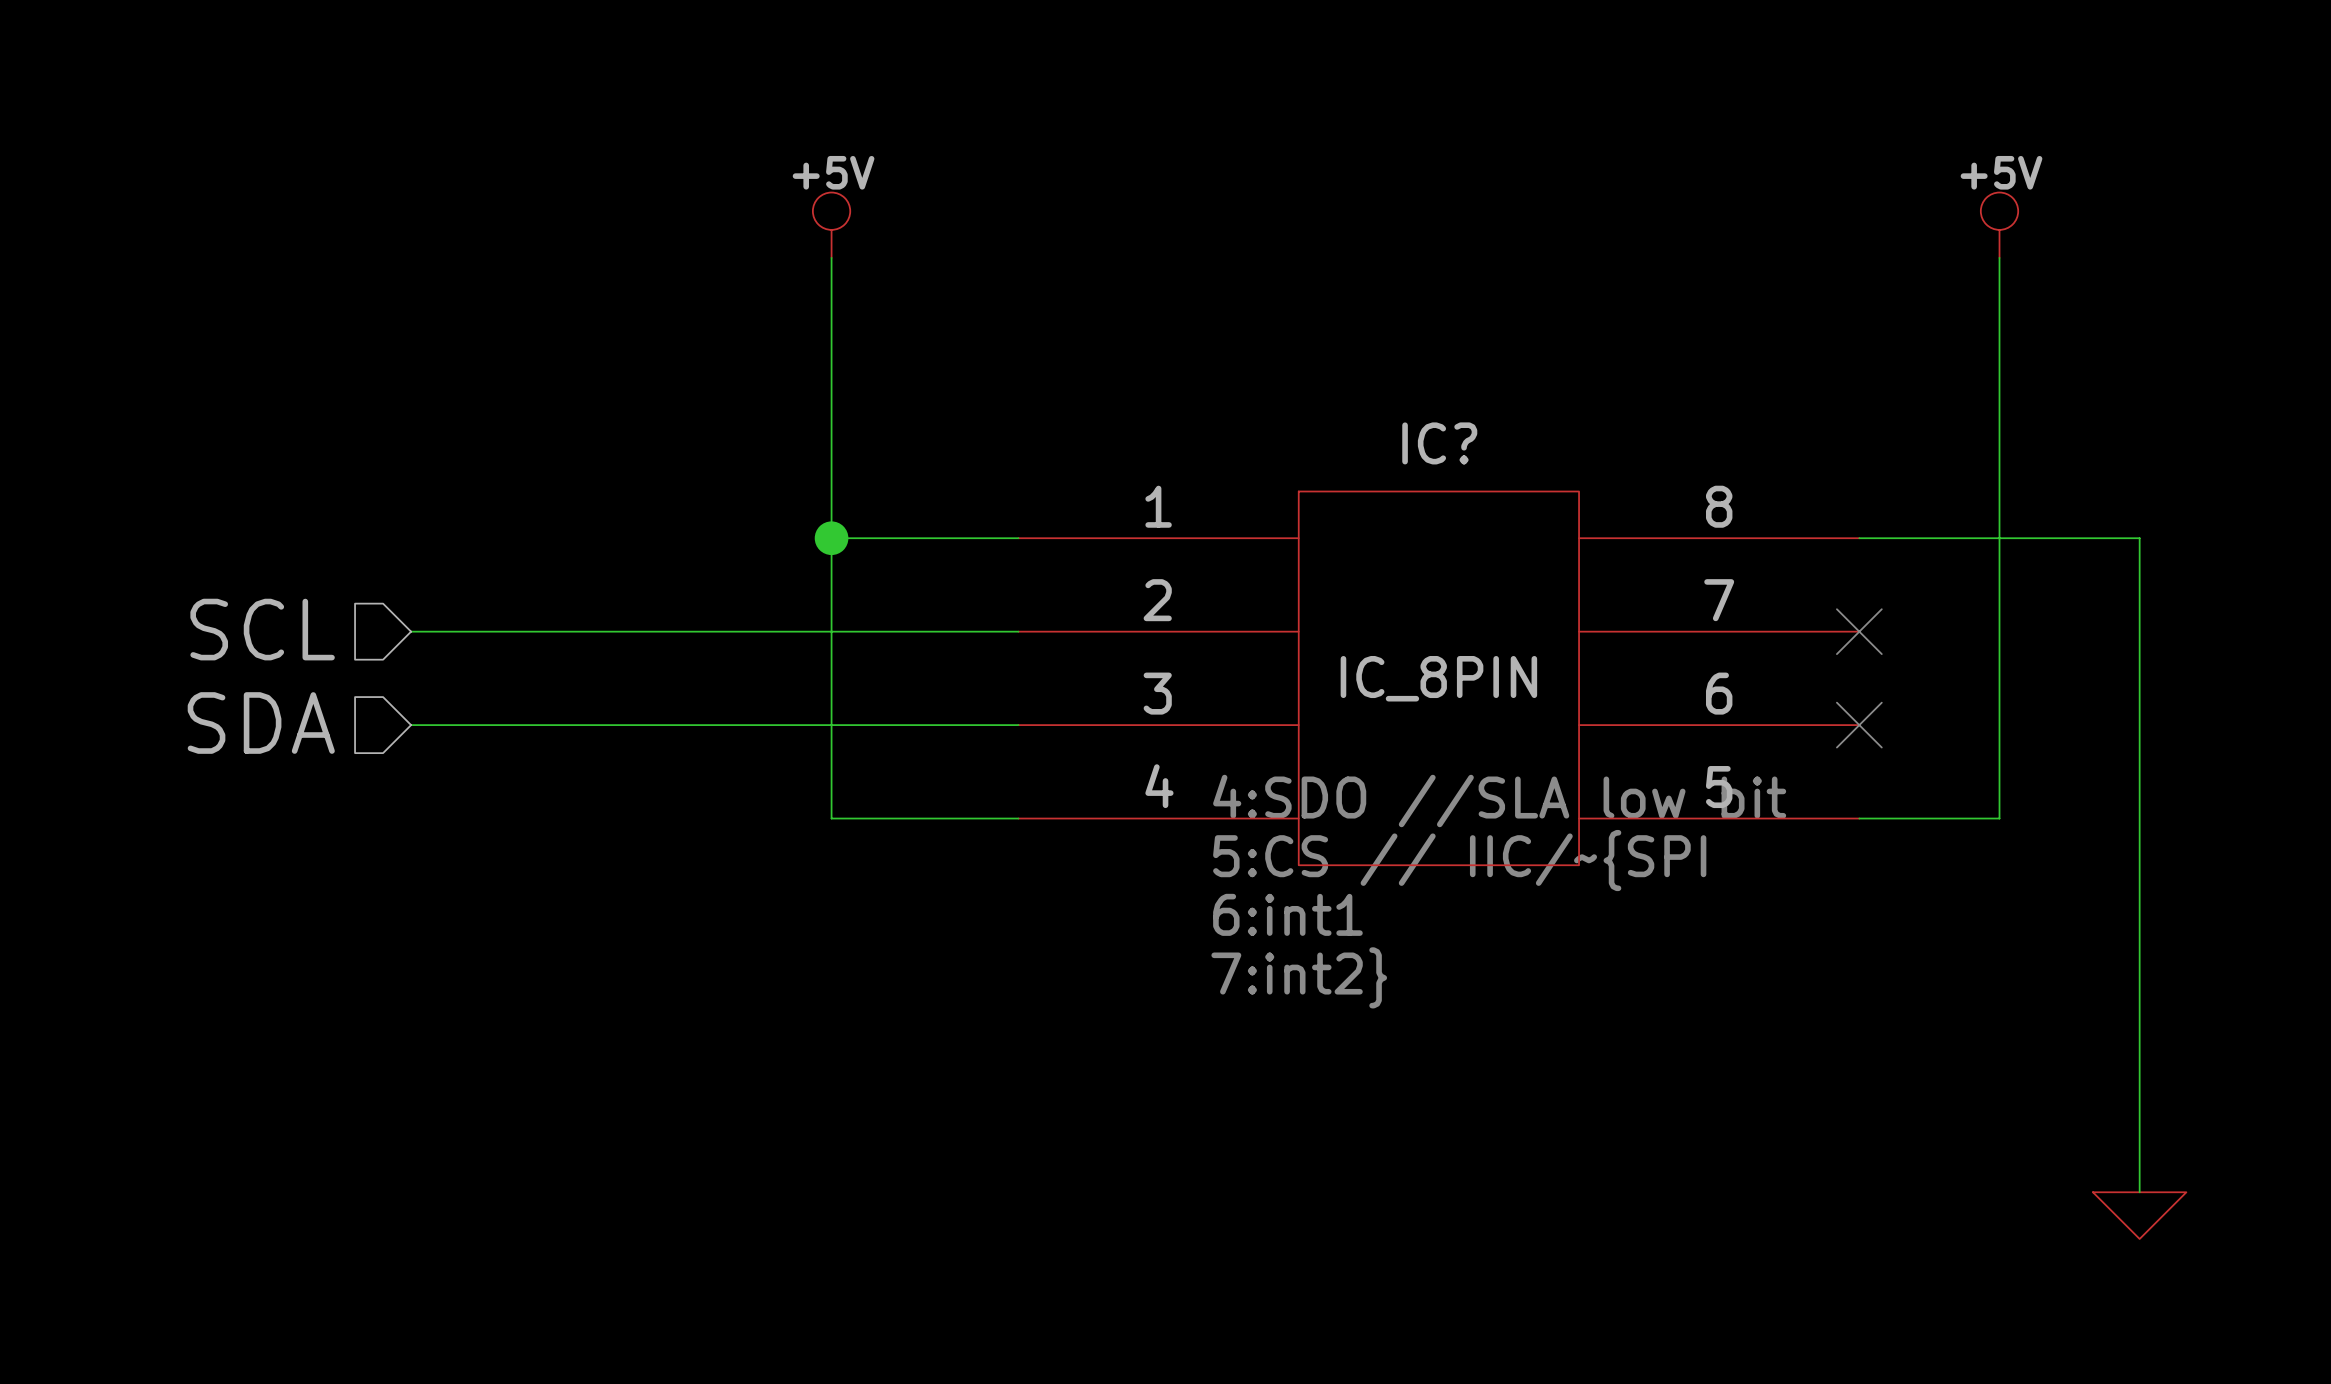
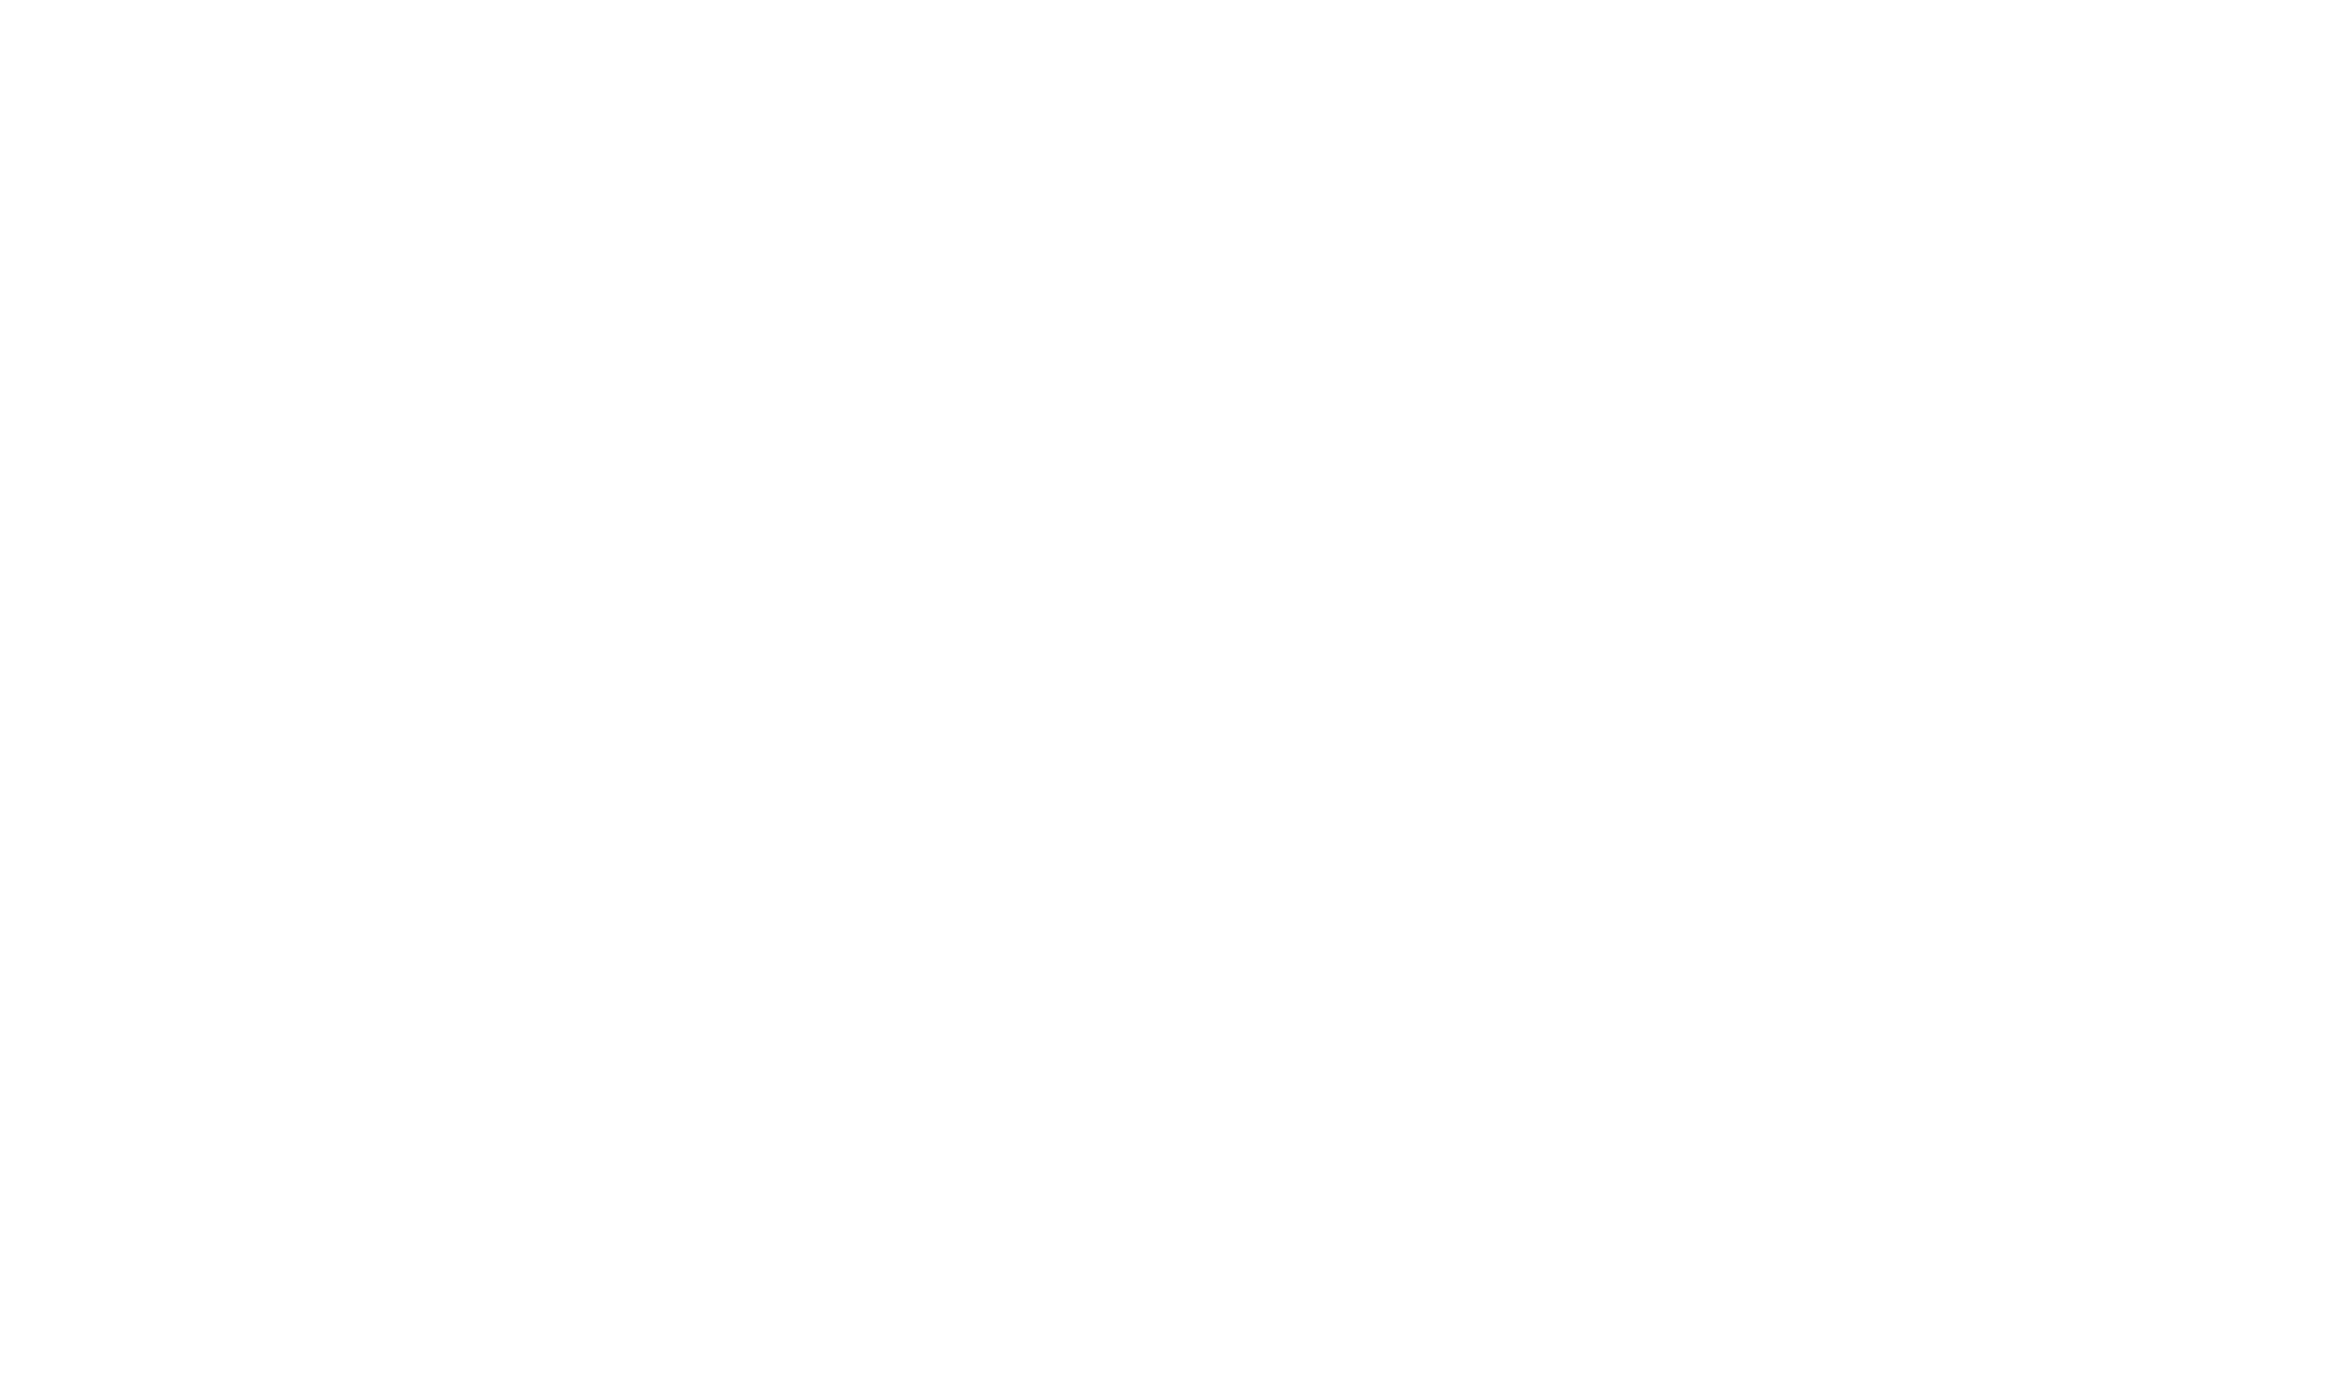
power symbol: +5V (831, 225) -> none
power symbol: +5V (1999, 225) -> none
wire: (831, 257) (831, 818) (1018, 818) -> none
wire: (1999, 257) (1999, 818) (1859, 818) -> none
wire: (831, 538) (1018, 538) -> none
junction: (831, 538) -> none
wire: (1859, 538) (2139, 538) (2139, 1192) -> none
hierarchical label: SCL (262, 629) -> none
wire: (411, 631) (1018, 631) -> none
no-connect mark: (1859, 631) -> none
IC?: IC_8PIN (1438, 678) -> none
hierarchical label: SDA (261, 723) -> none
wire: (411, 725) (1018, 725) -> none
no-connect mark: (1859, 725) -> none
text: 4:SDO //SLA low bit (1499, 800) -> none
text: 5:CS // IIC/~{SPI (1459, 860) -> none
text: 6:int1 (1287, 914) -> none
text: 7:int2} (1299, 977) -> none
power symbol: (2139, 1215) -> none

